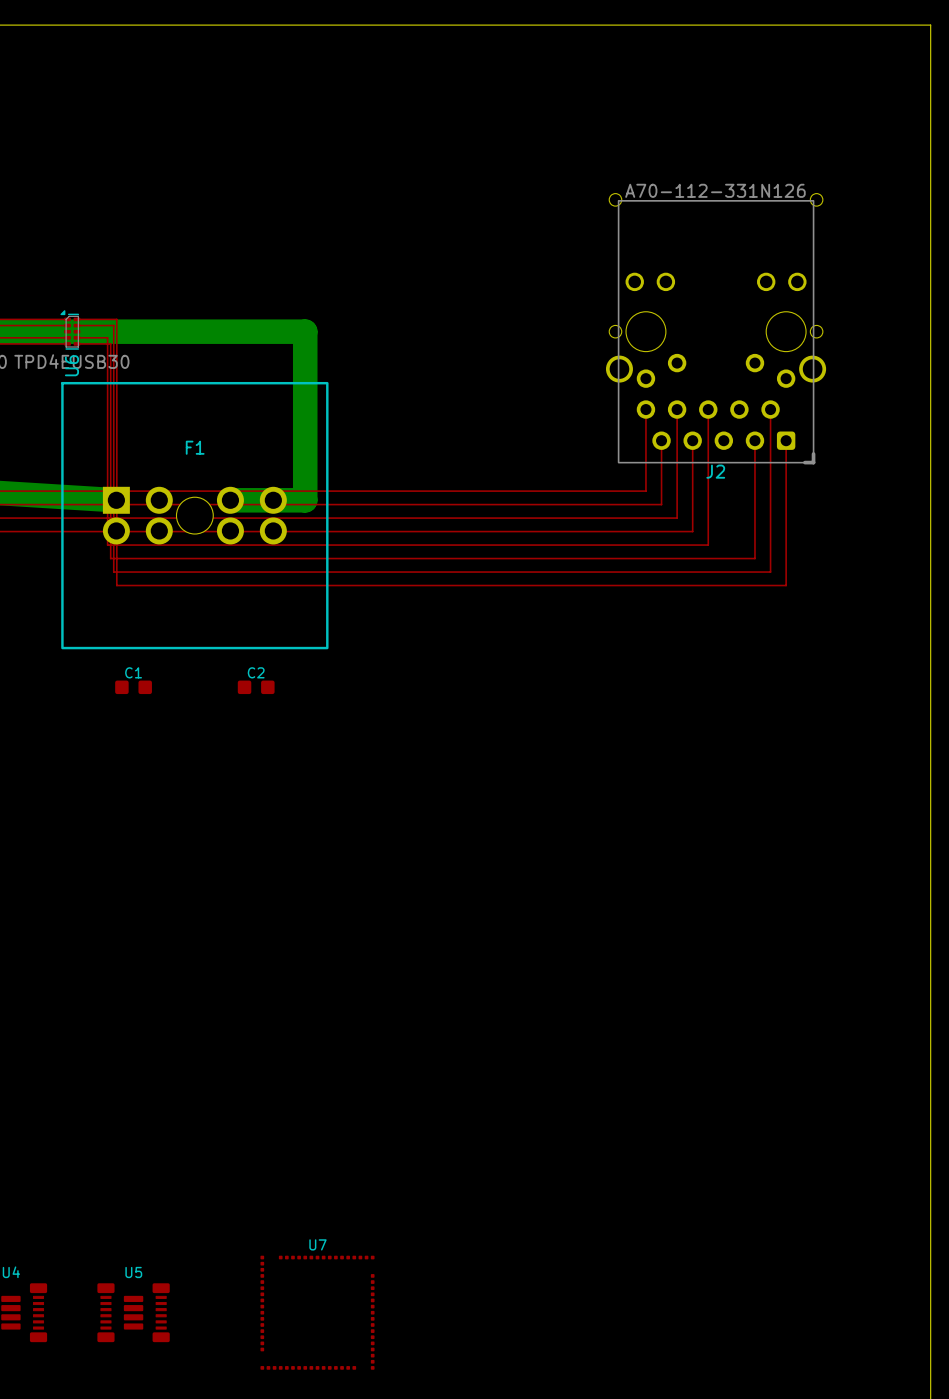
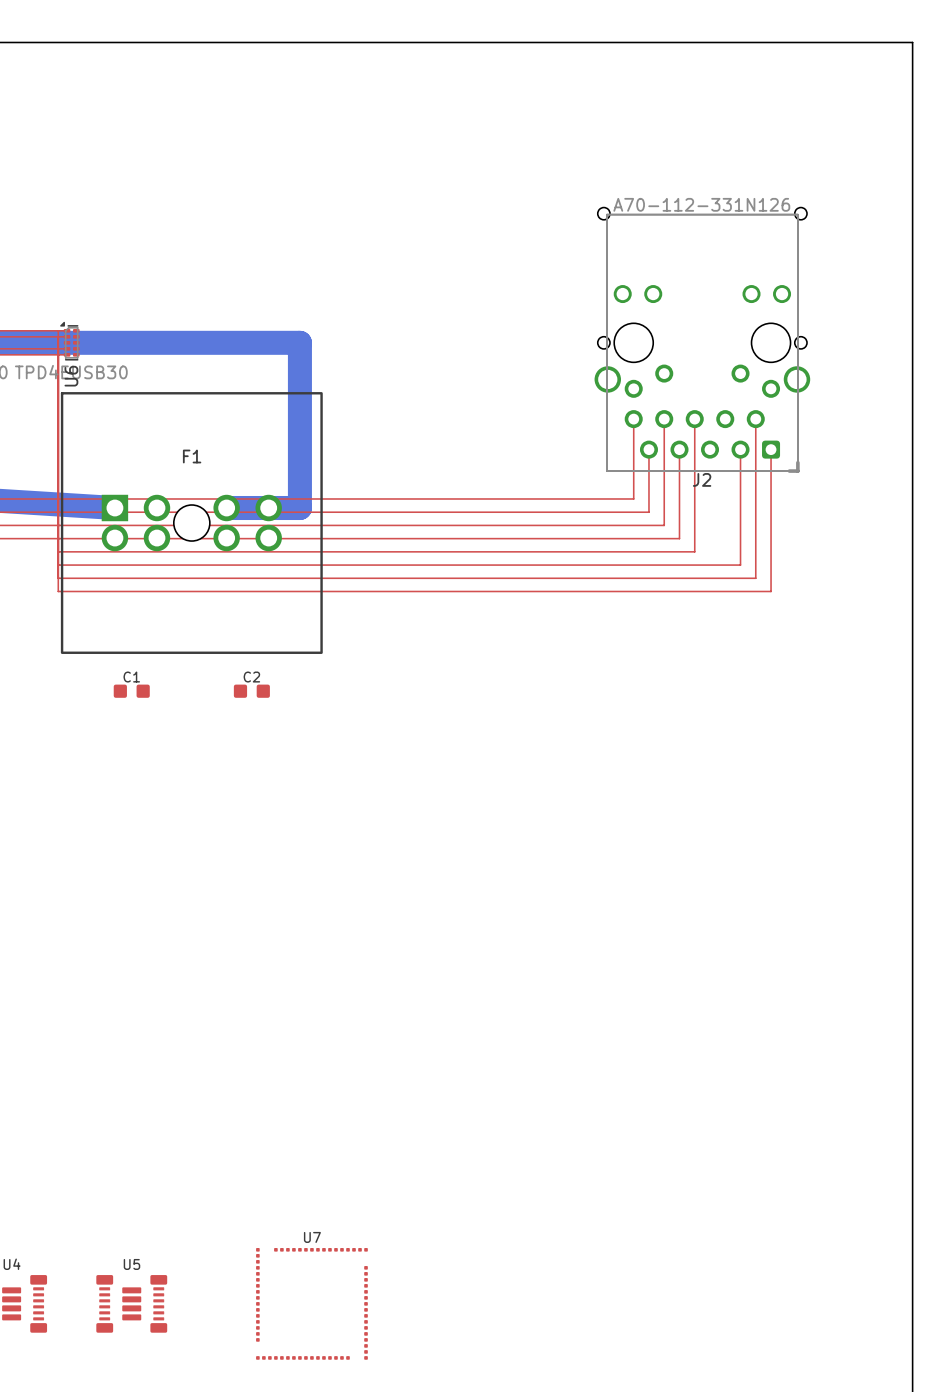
top track: (76, 319) (116, 319) (116, 585) -> (58, 330) (58, 591) (115, 591)
top track: (76, 325) (113, 325) (113, 572) -> (58, 578) (112, 578)
top track: (76, 337) (107, 337) (107, 545) -> (58, 551) (106, 551)
top track: (76, 343) (110, 343) (110, 558) -> (58, 565) (109, 565)

